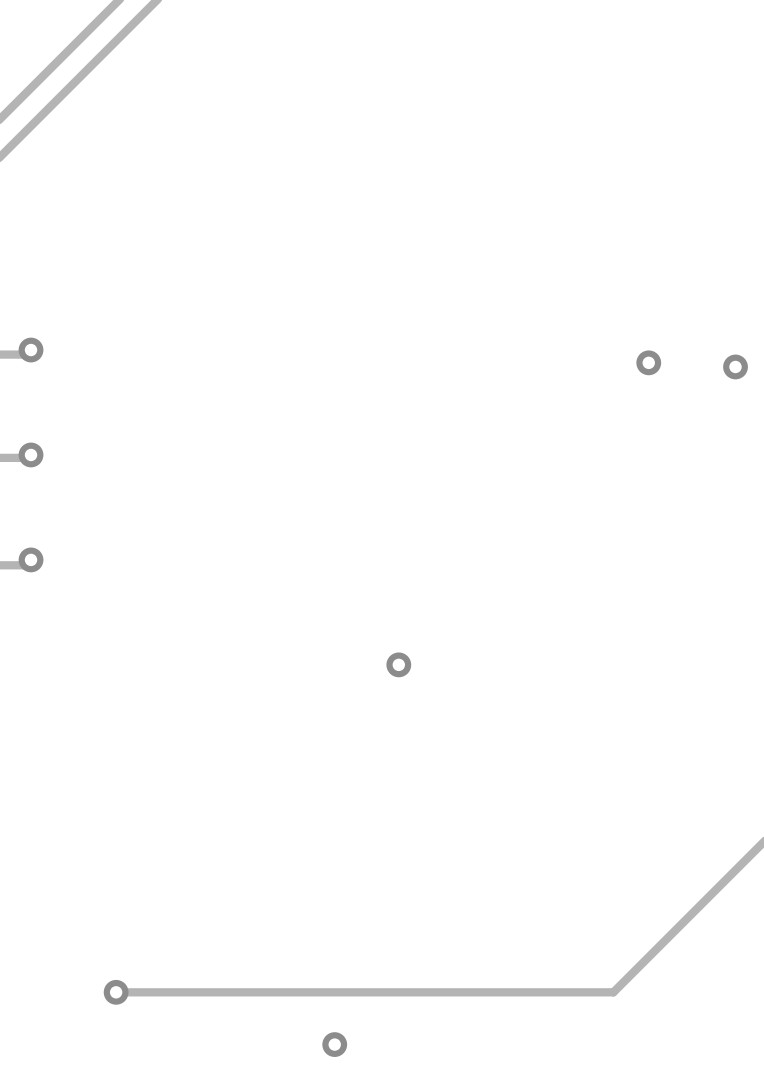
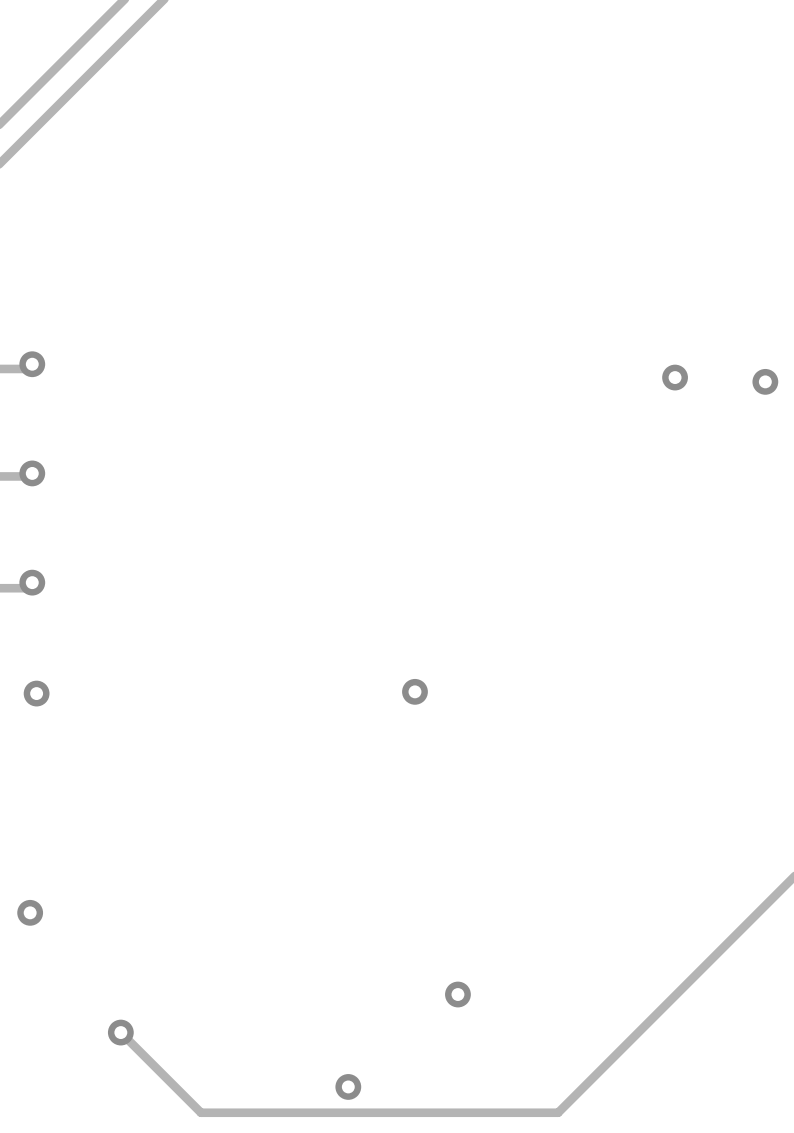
via: none -> (36, 693)
via: none -> (30, 912)
via: none -> (457, 994)
track: (613, 992) (116, 992) -> (638, 1032) (558, 1112) (201, 1112) (120, 1032)

